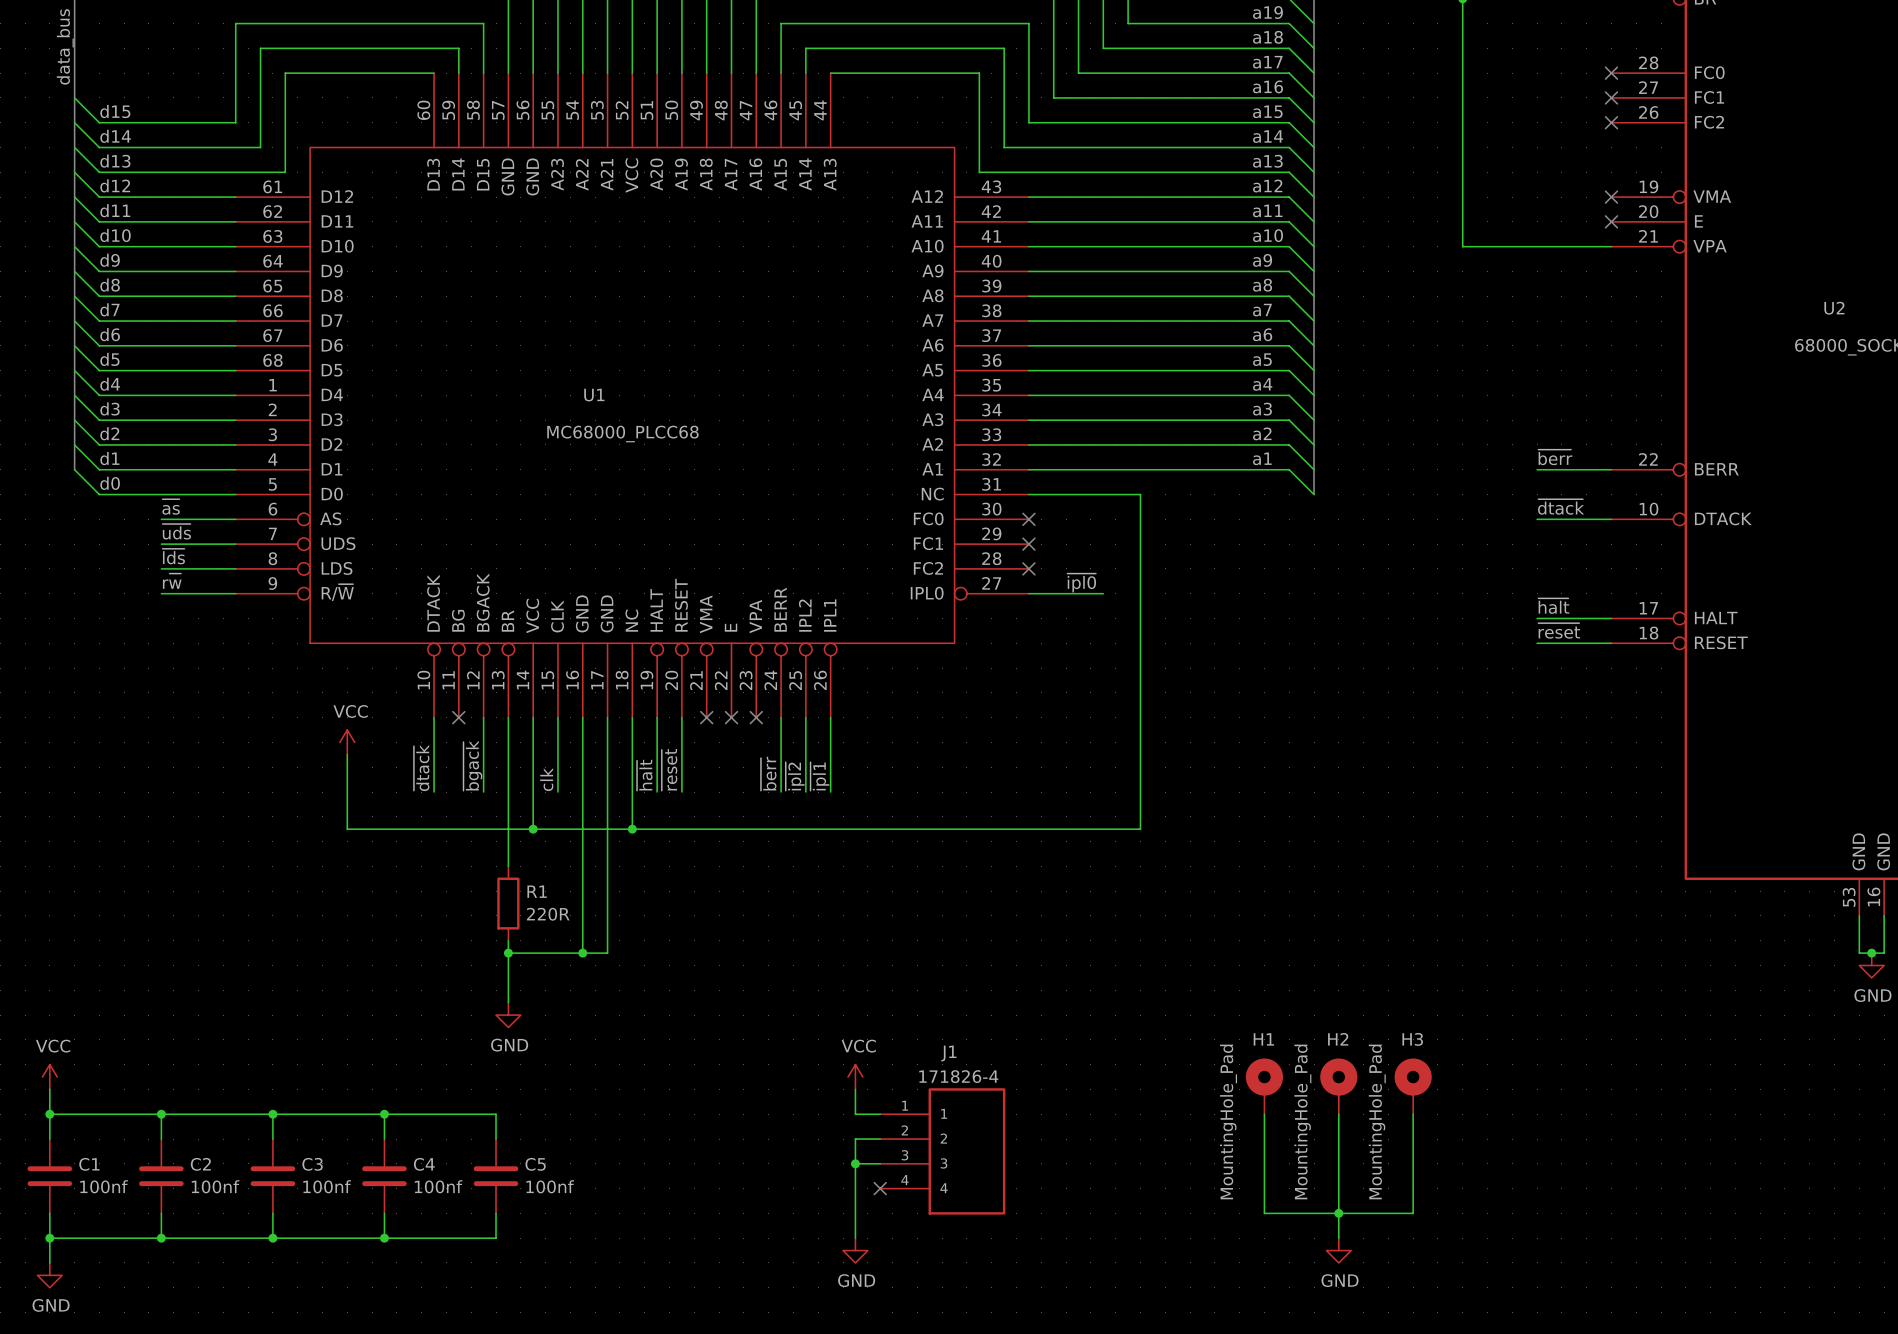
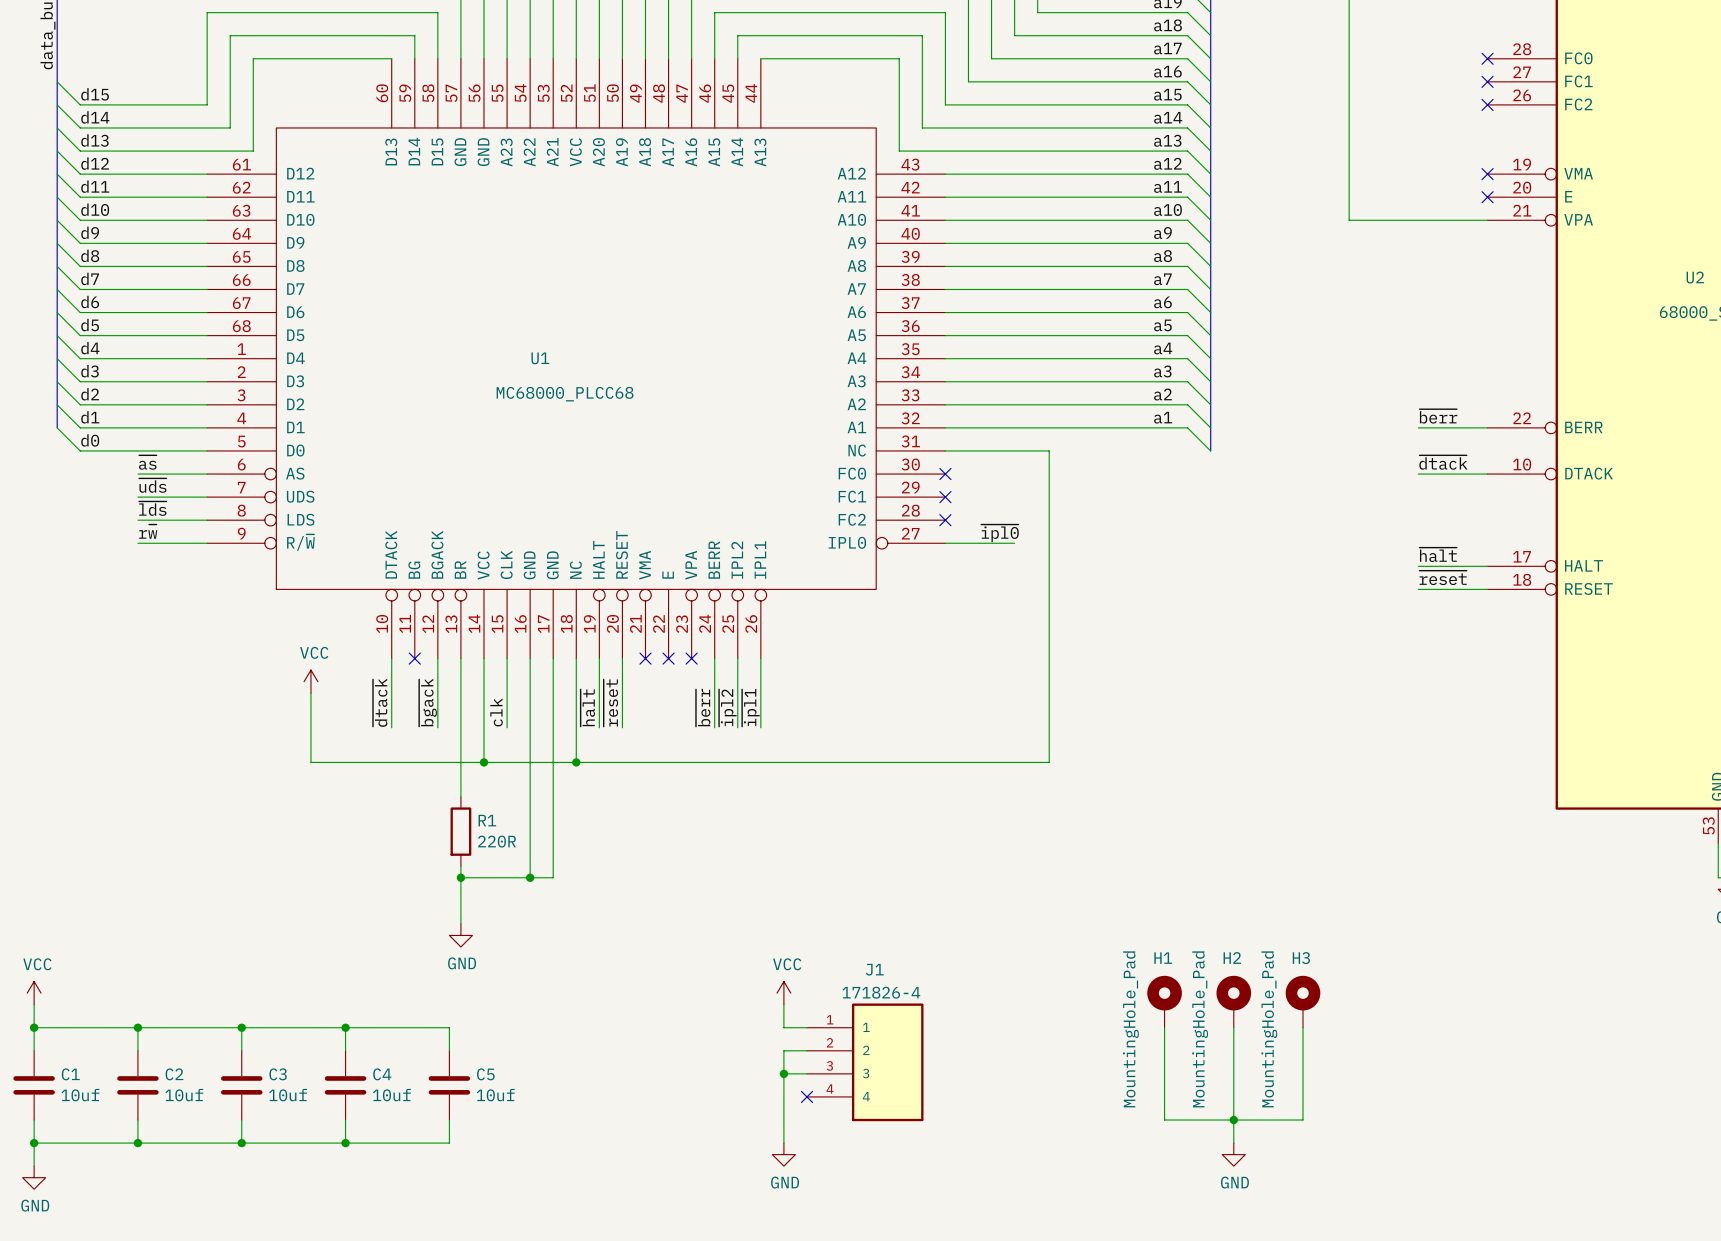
C1 value: 100nf (104, 1186) -> 10uf (80, 1095)
C2 value: 100nf (215, 1186) -> 10uf (184, 1095)
C3 value: 100nf (327, 1186) -> 10uf (288, 1095)
C4 value: 100nf (438, 1186) -> 10uf (391, 1095)
C5 value: 100nf (550, 1186) -> 10uf (495, 1095)

